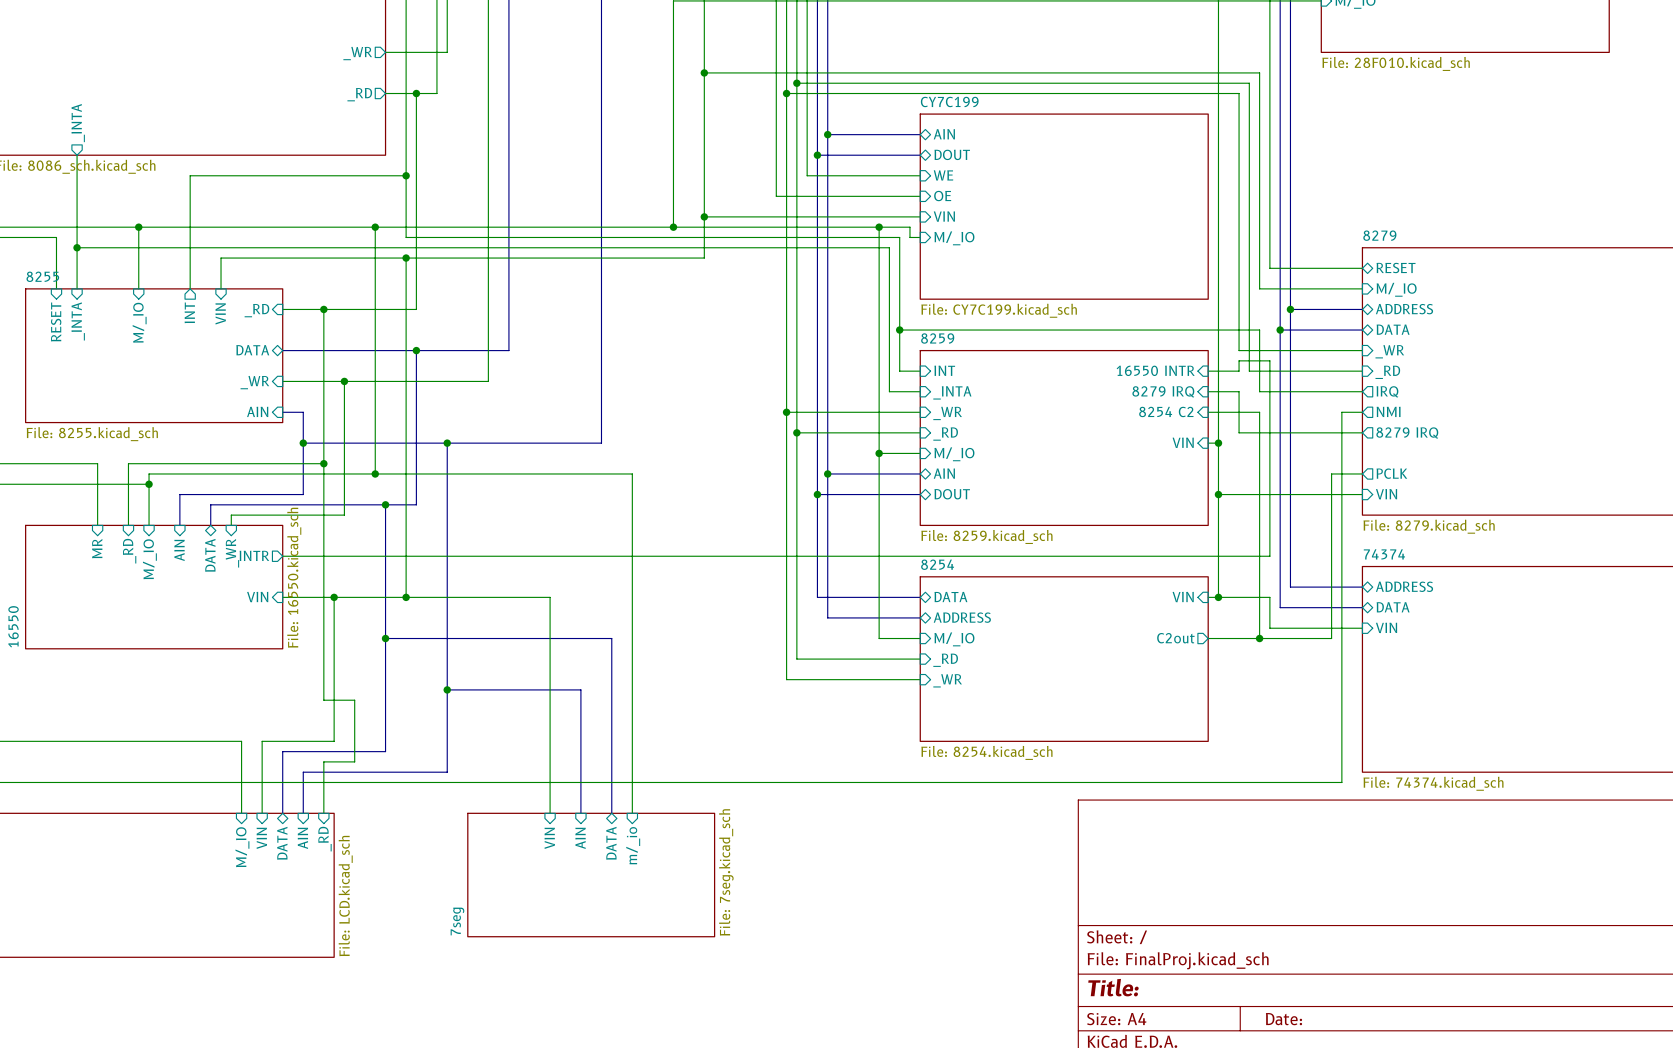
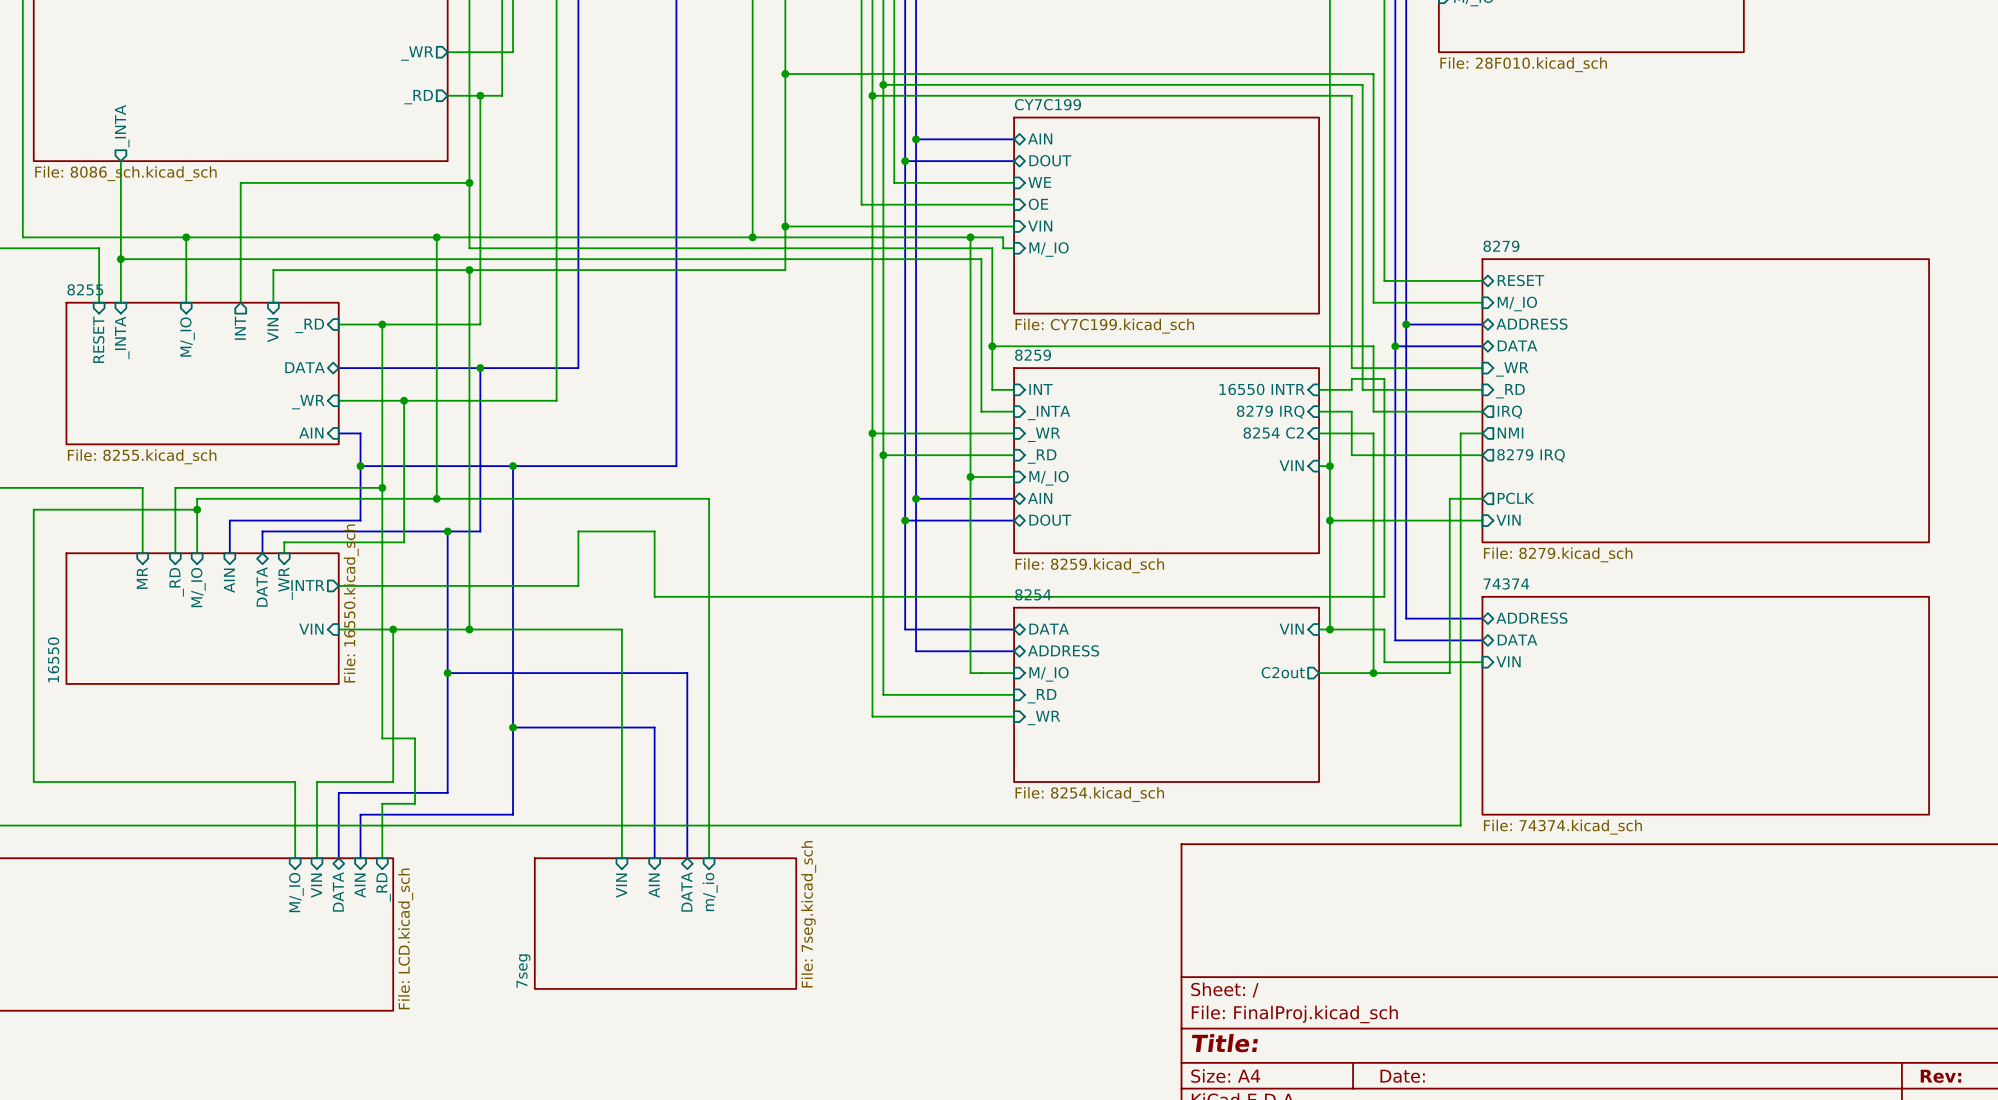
wire: (508, 556) (1269, 556) -> (578, 585) (578, 531) (654, 531) (654, 596) (1384, 596) (1384, 585)

